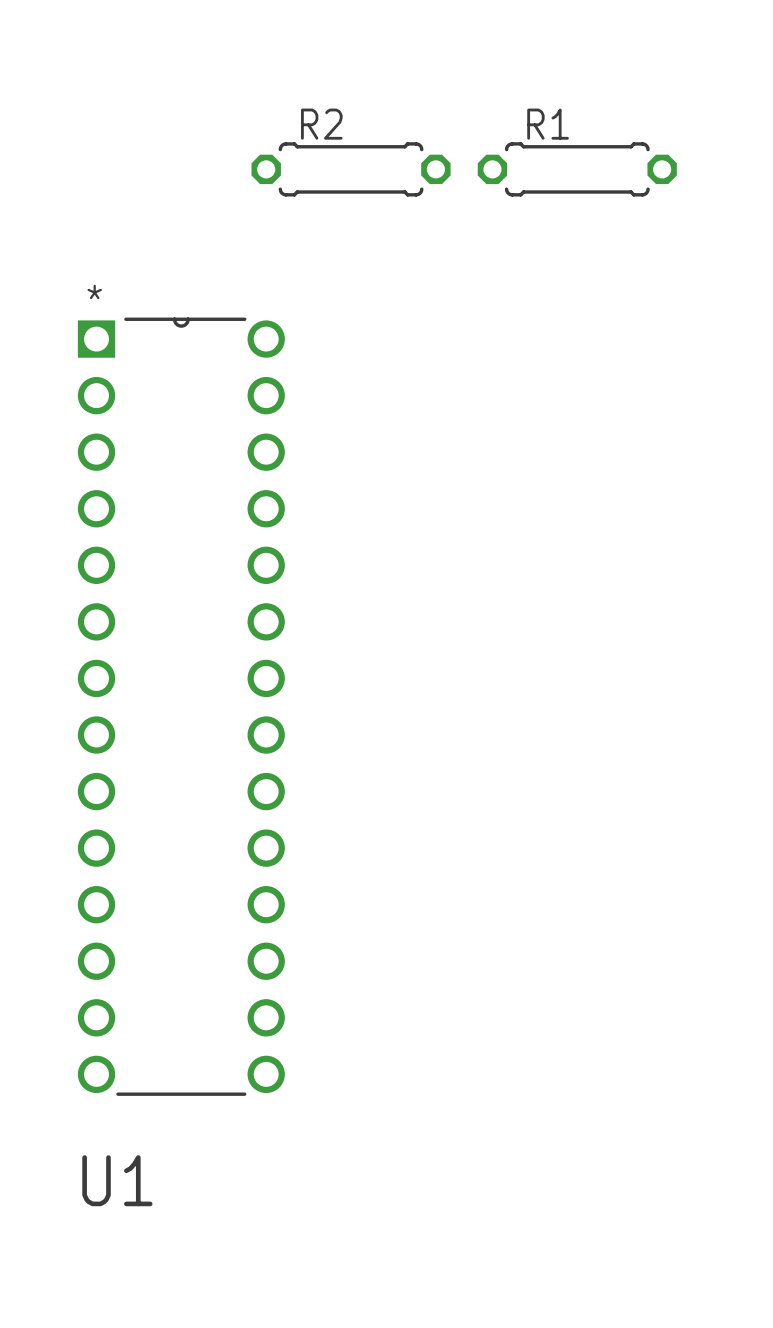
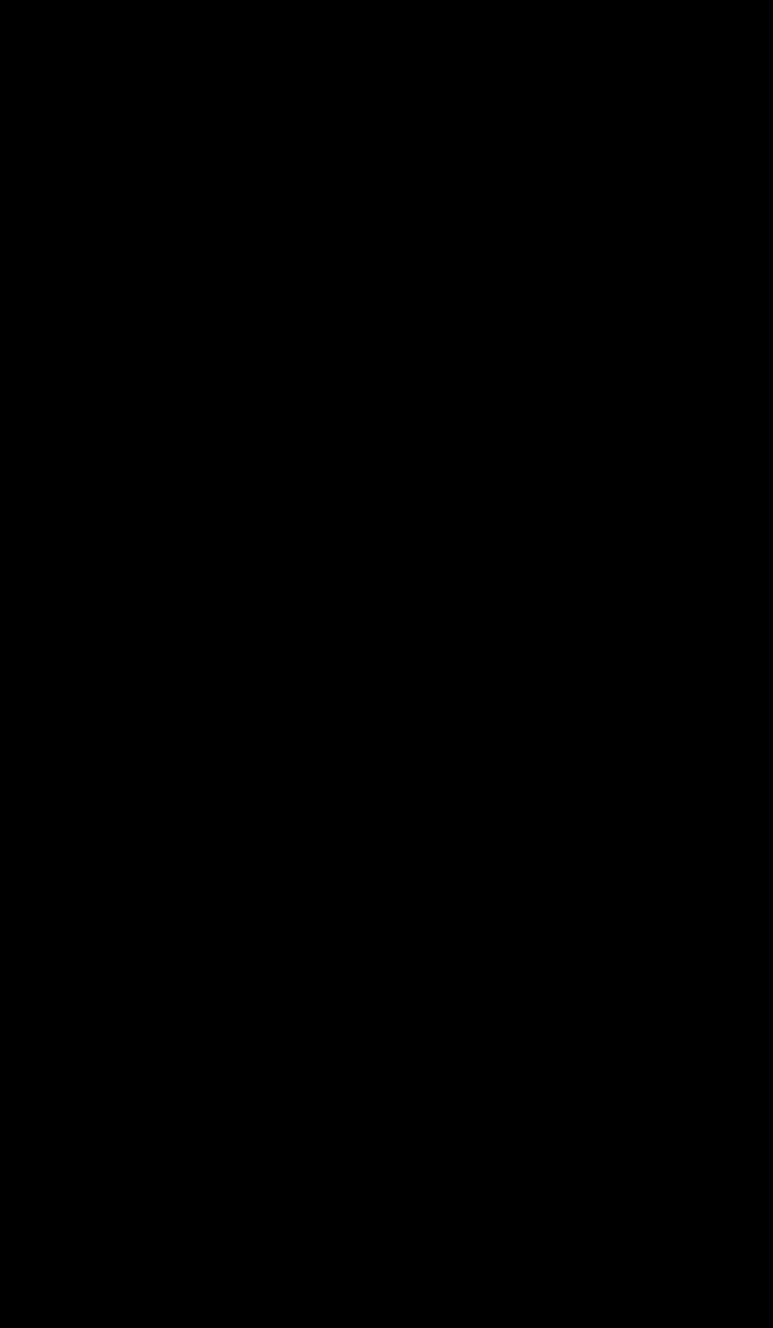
R2: (351, 169) -> none
R1: (577, 169) -> none
U1: (181, 706) -> none

